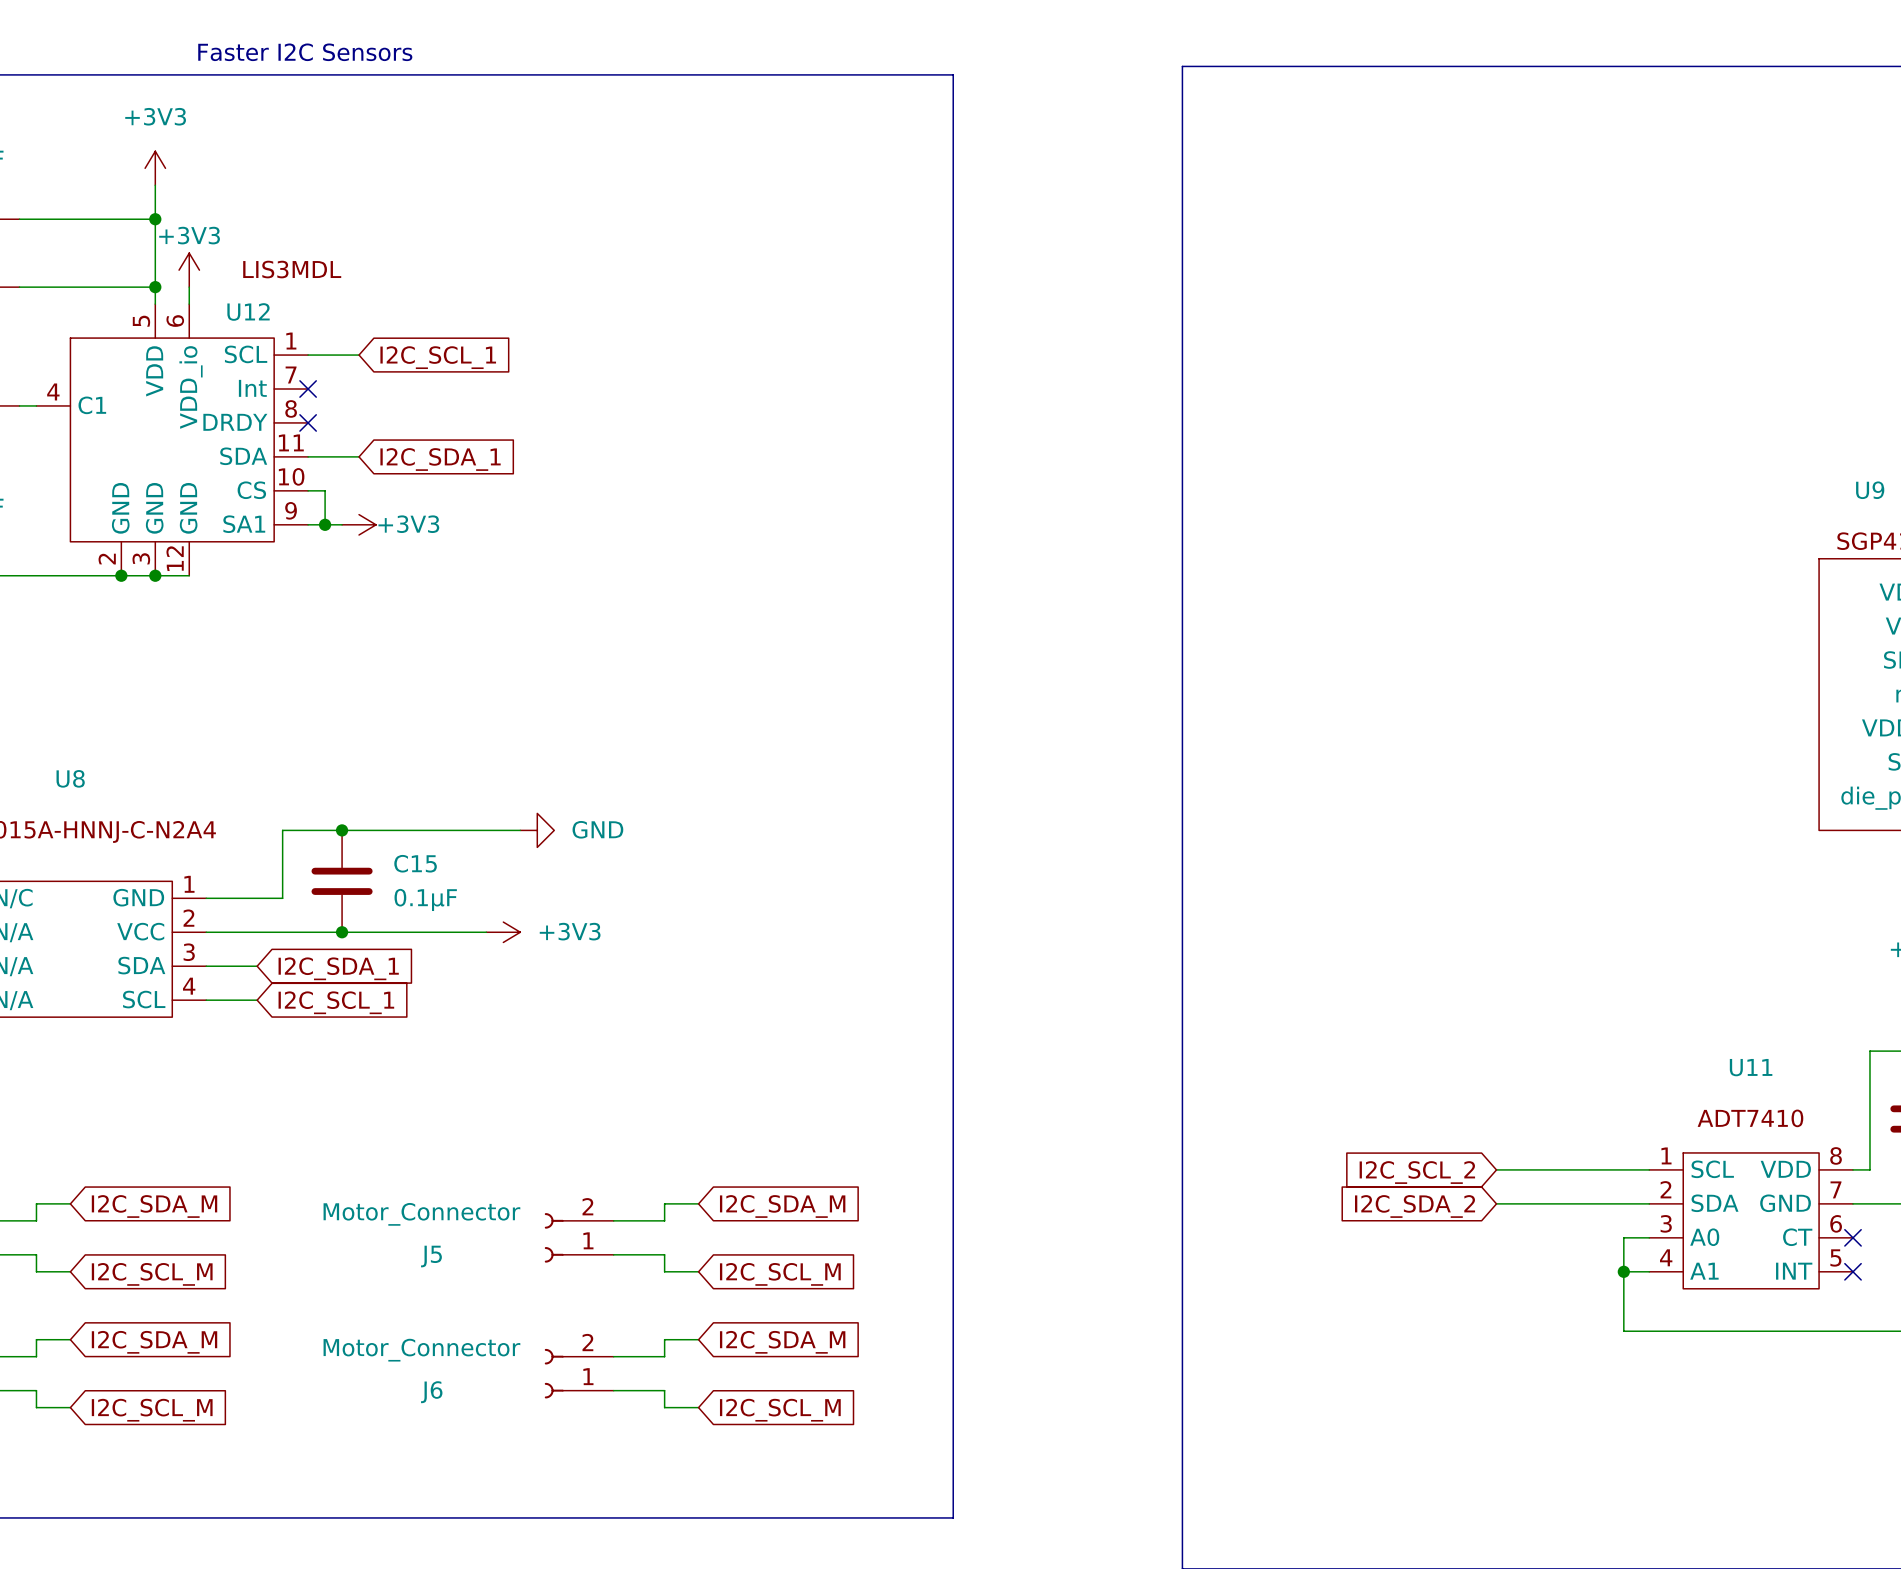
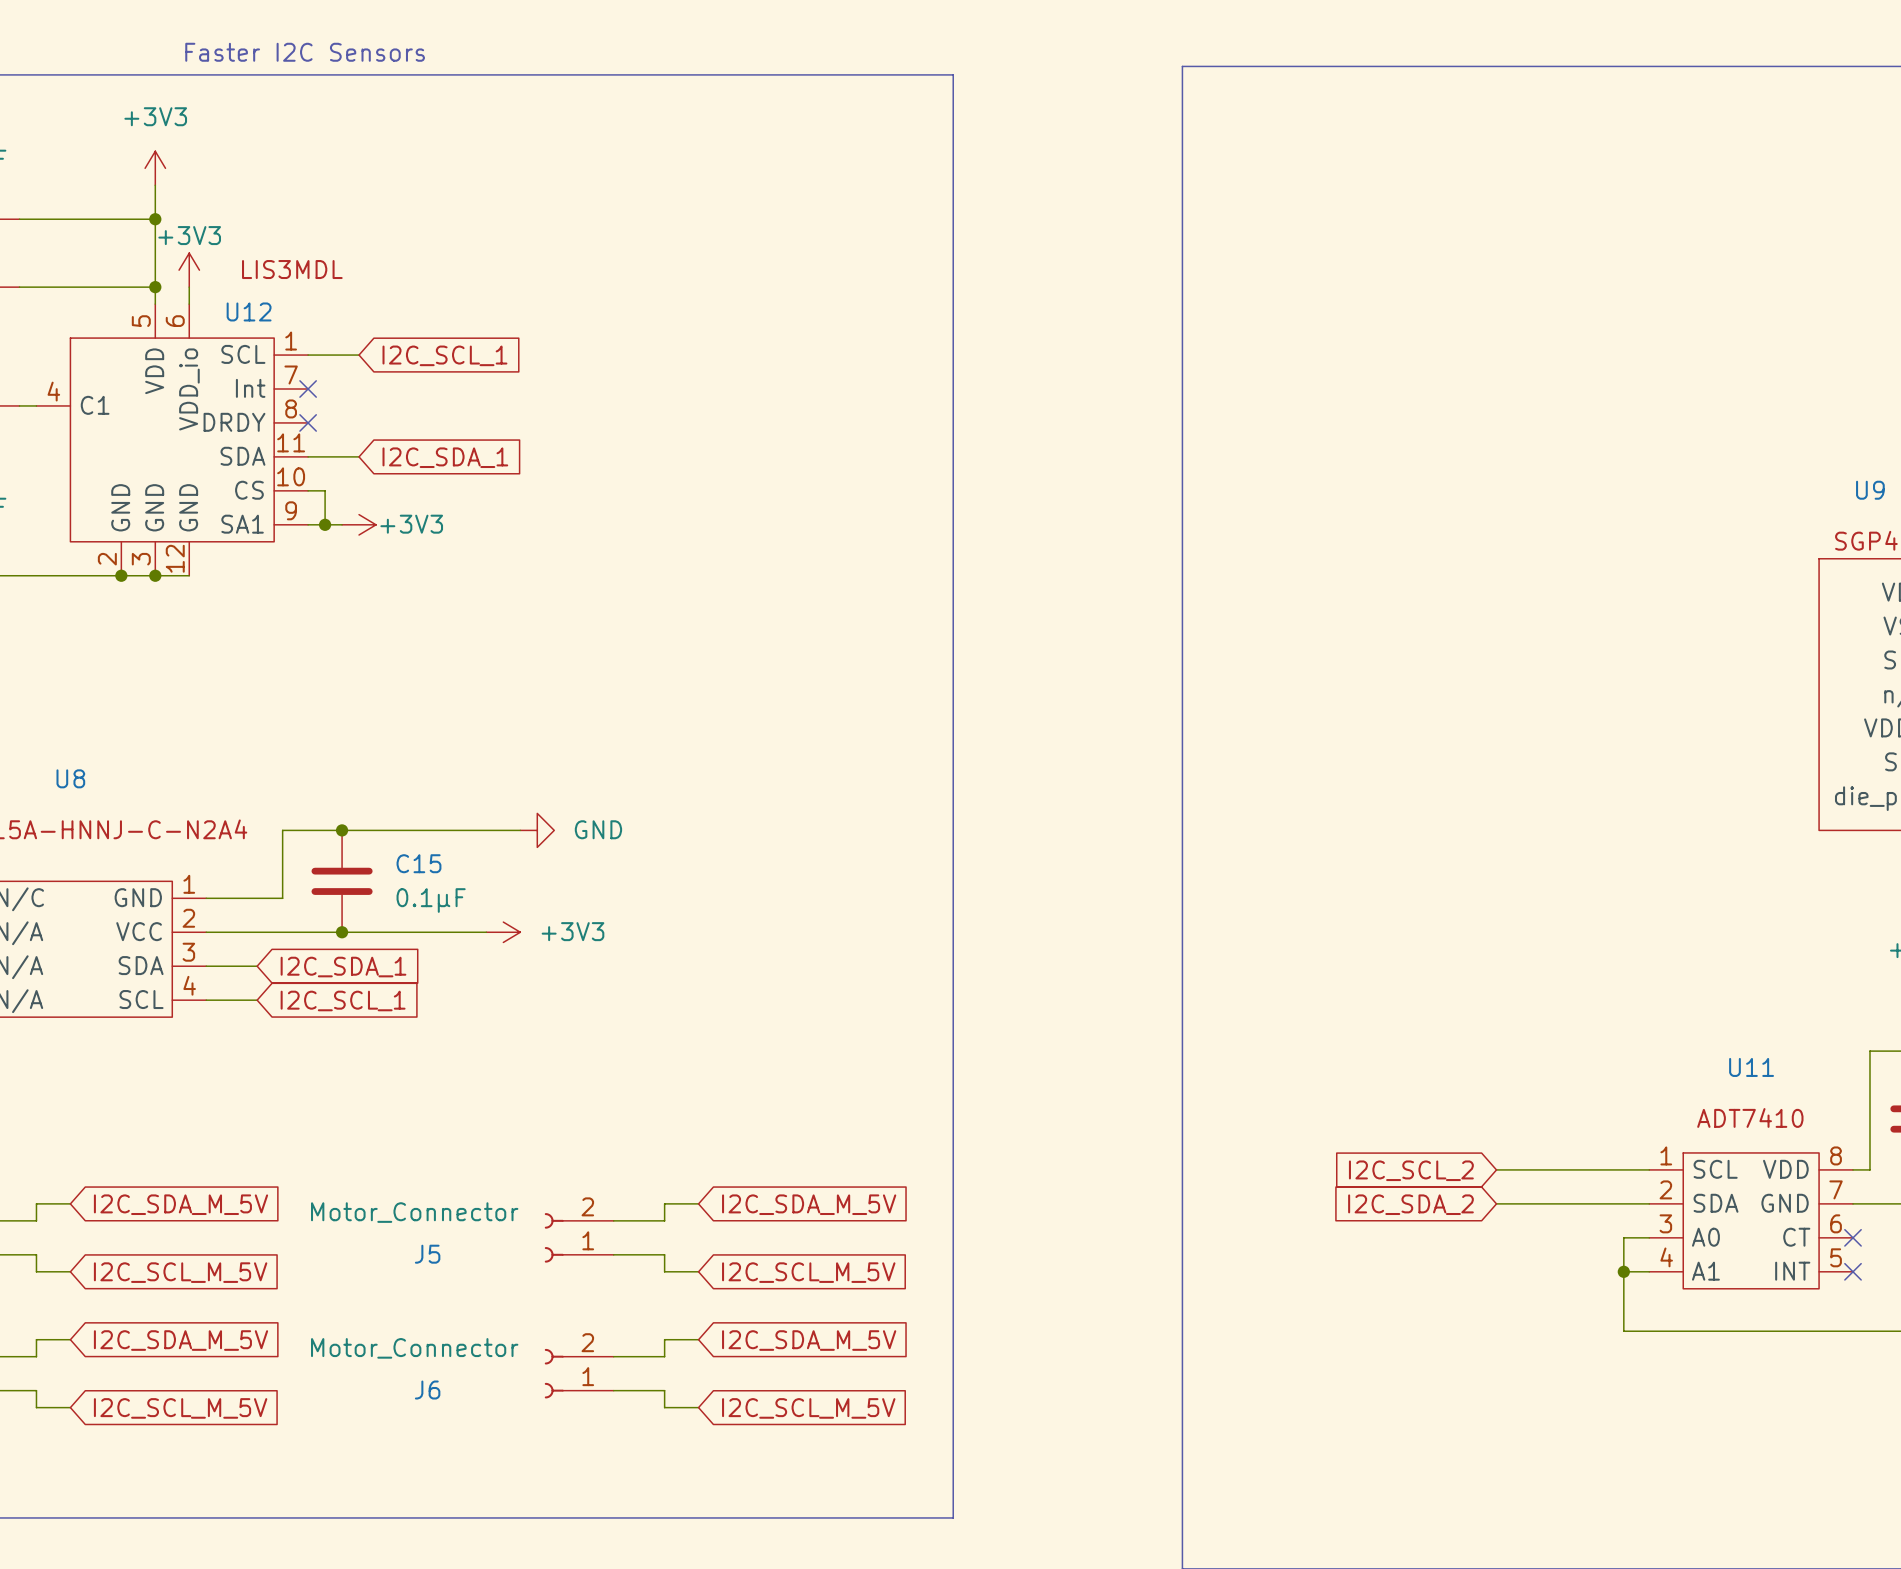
global label: I2C_SDA_M (154, 1206) -> I2C_SDA_M_5V (181, 1204)
global label: I2C_SDA_M (782, 1206) -> I2C_SDA_M_5V (809, 1204)
global label: I2C_SCL_M (152, 1274) -> I2C_SCL_M_5V (180, 1272)
global label: I2C_SCL_M (780, 1274) -> I2C_SCL_M_5V (808, 1272)
global label: I2C_SDA_M (154, 1342) -> I2C_SDA_M_5V (181, 1340)
global label: I2C_SDA_M (782, 1342) -> I2C_SDA_M_5V (809, 1340)
global label: I2C_SCL_M (152, 1410) -> I2C_SCL_M_5V (180, 1408)
global label: I2C_SCL_M (780, 1410) -> I2C_SCL_M_5V (808, 1408)

